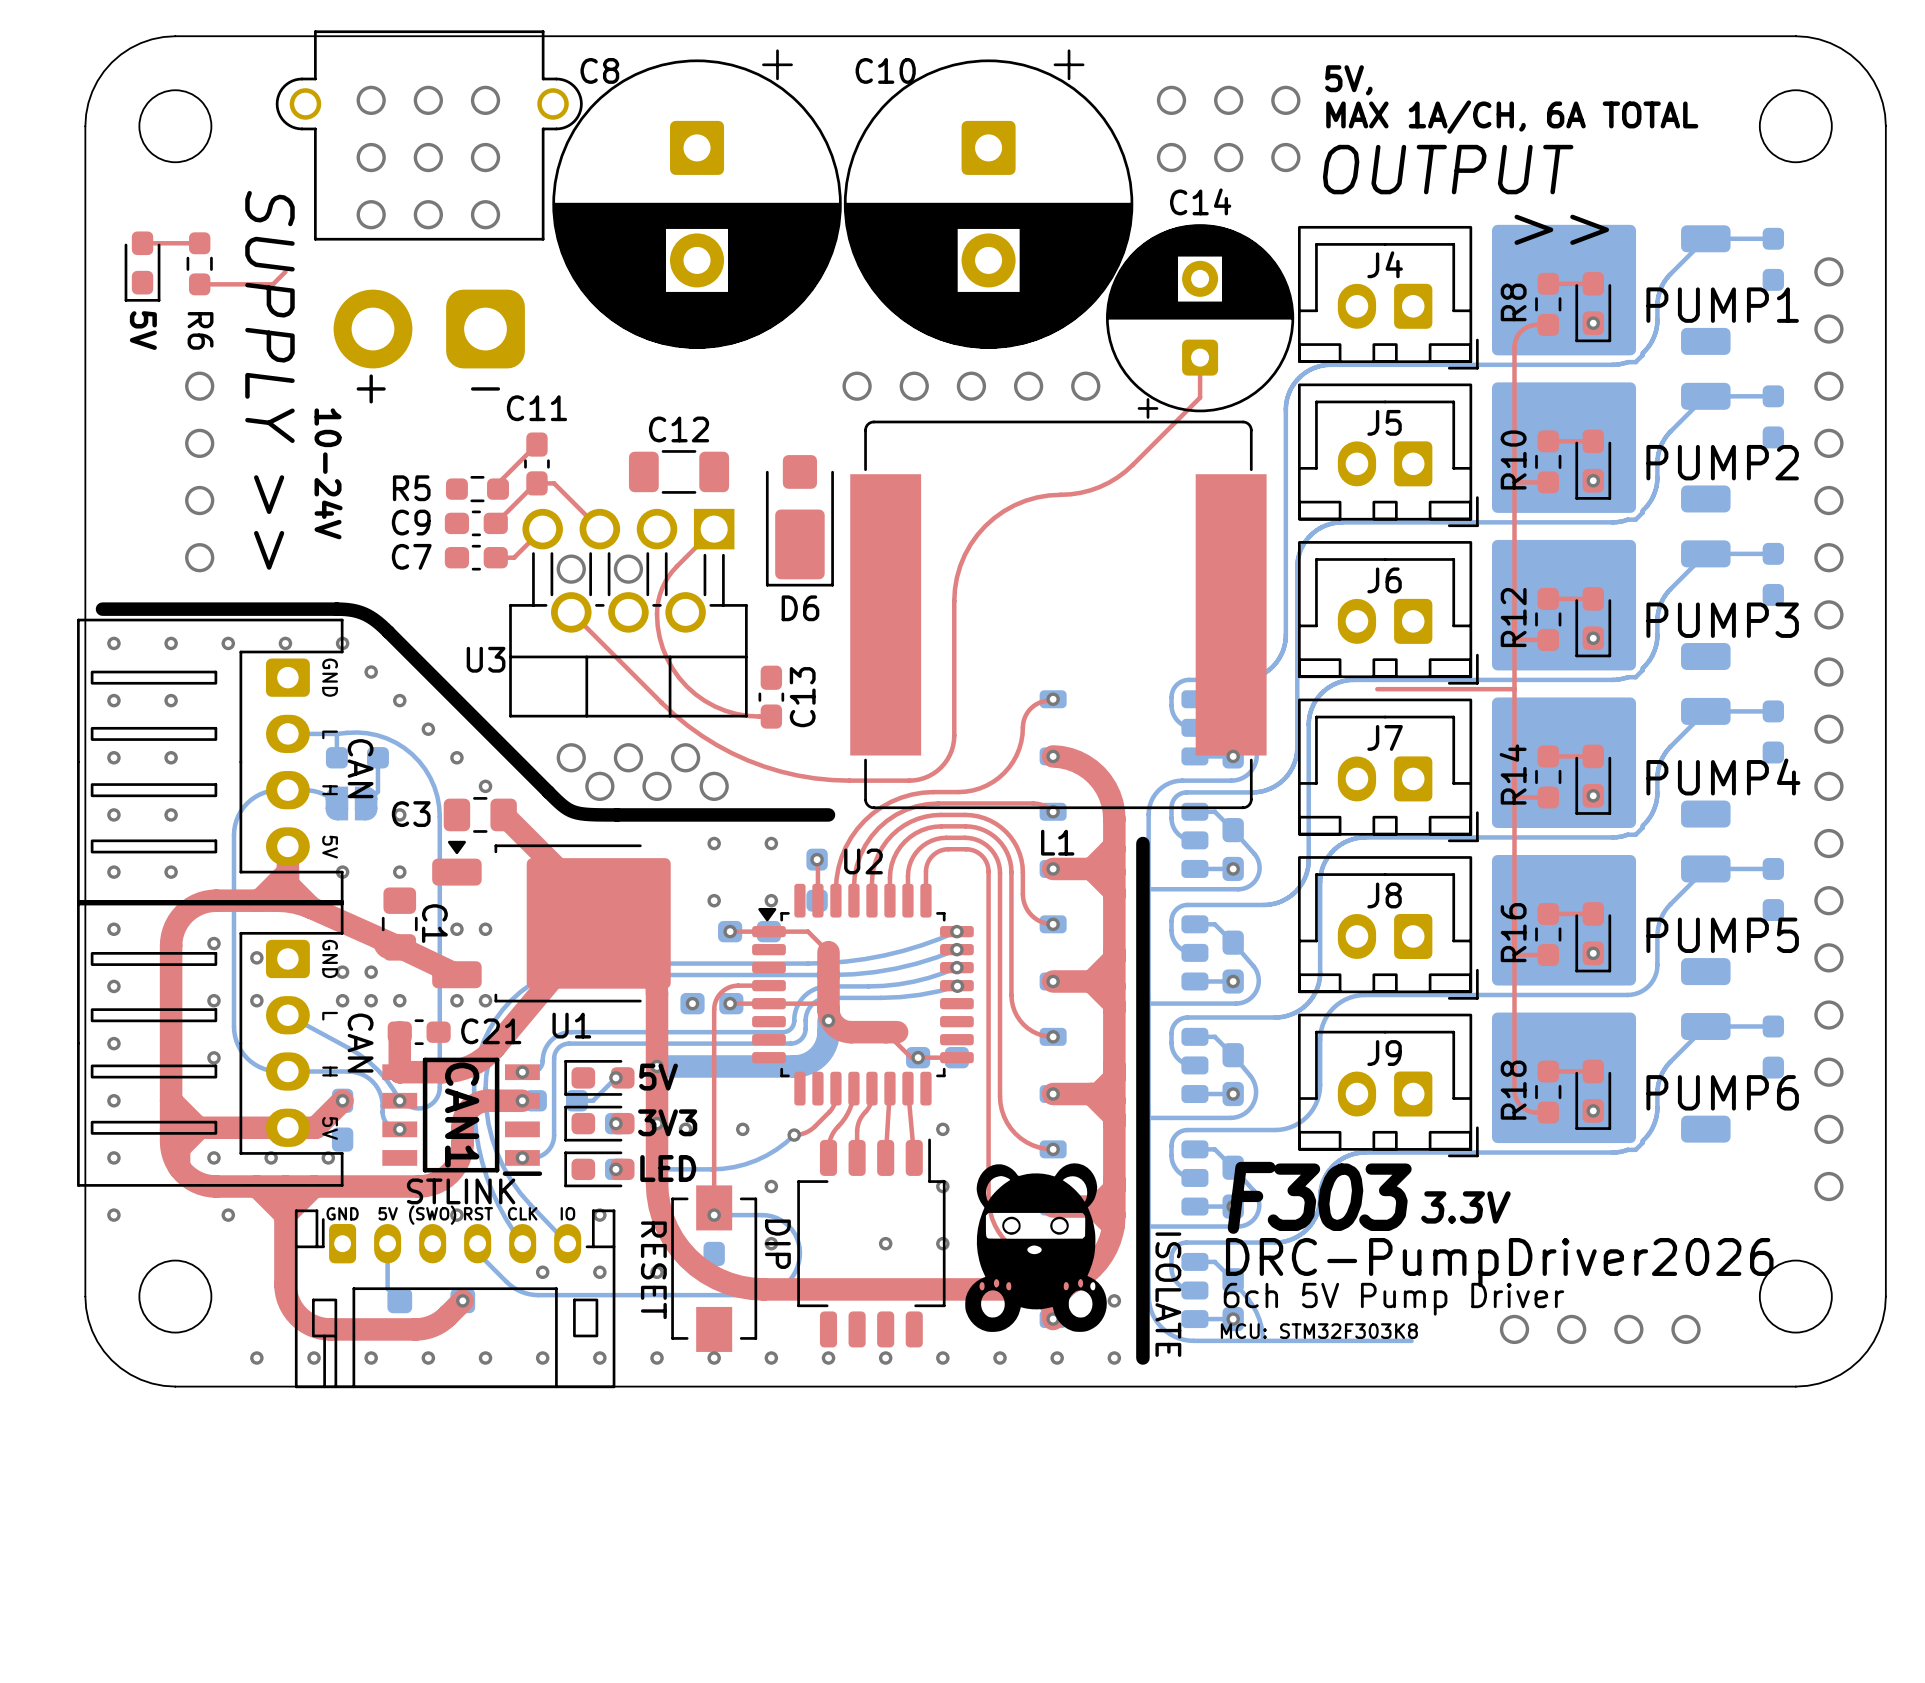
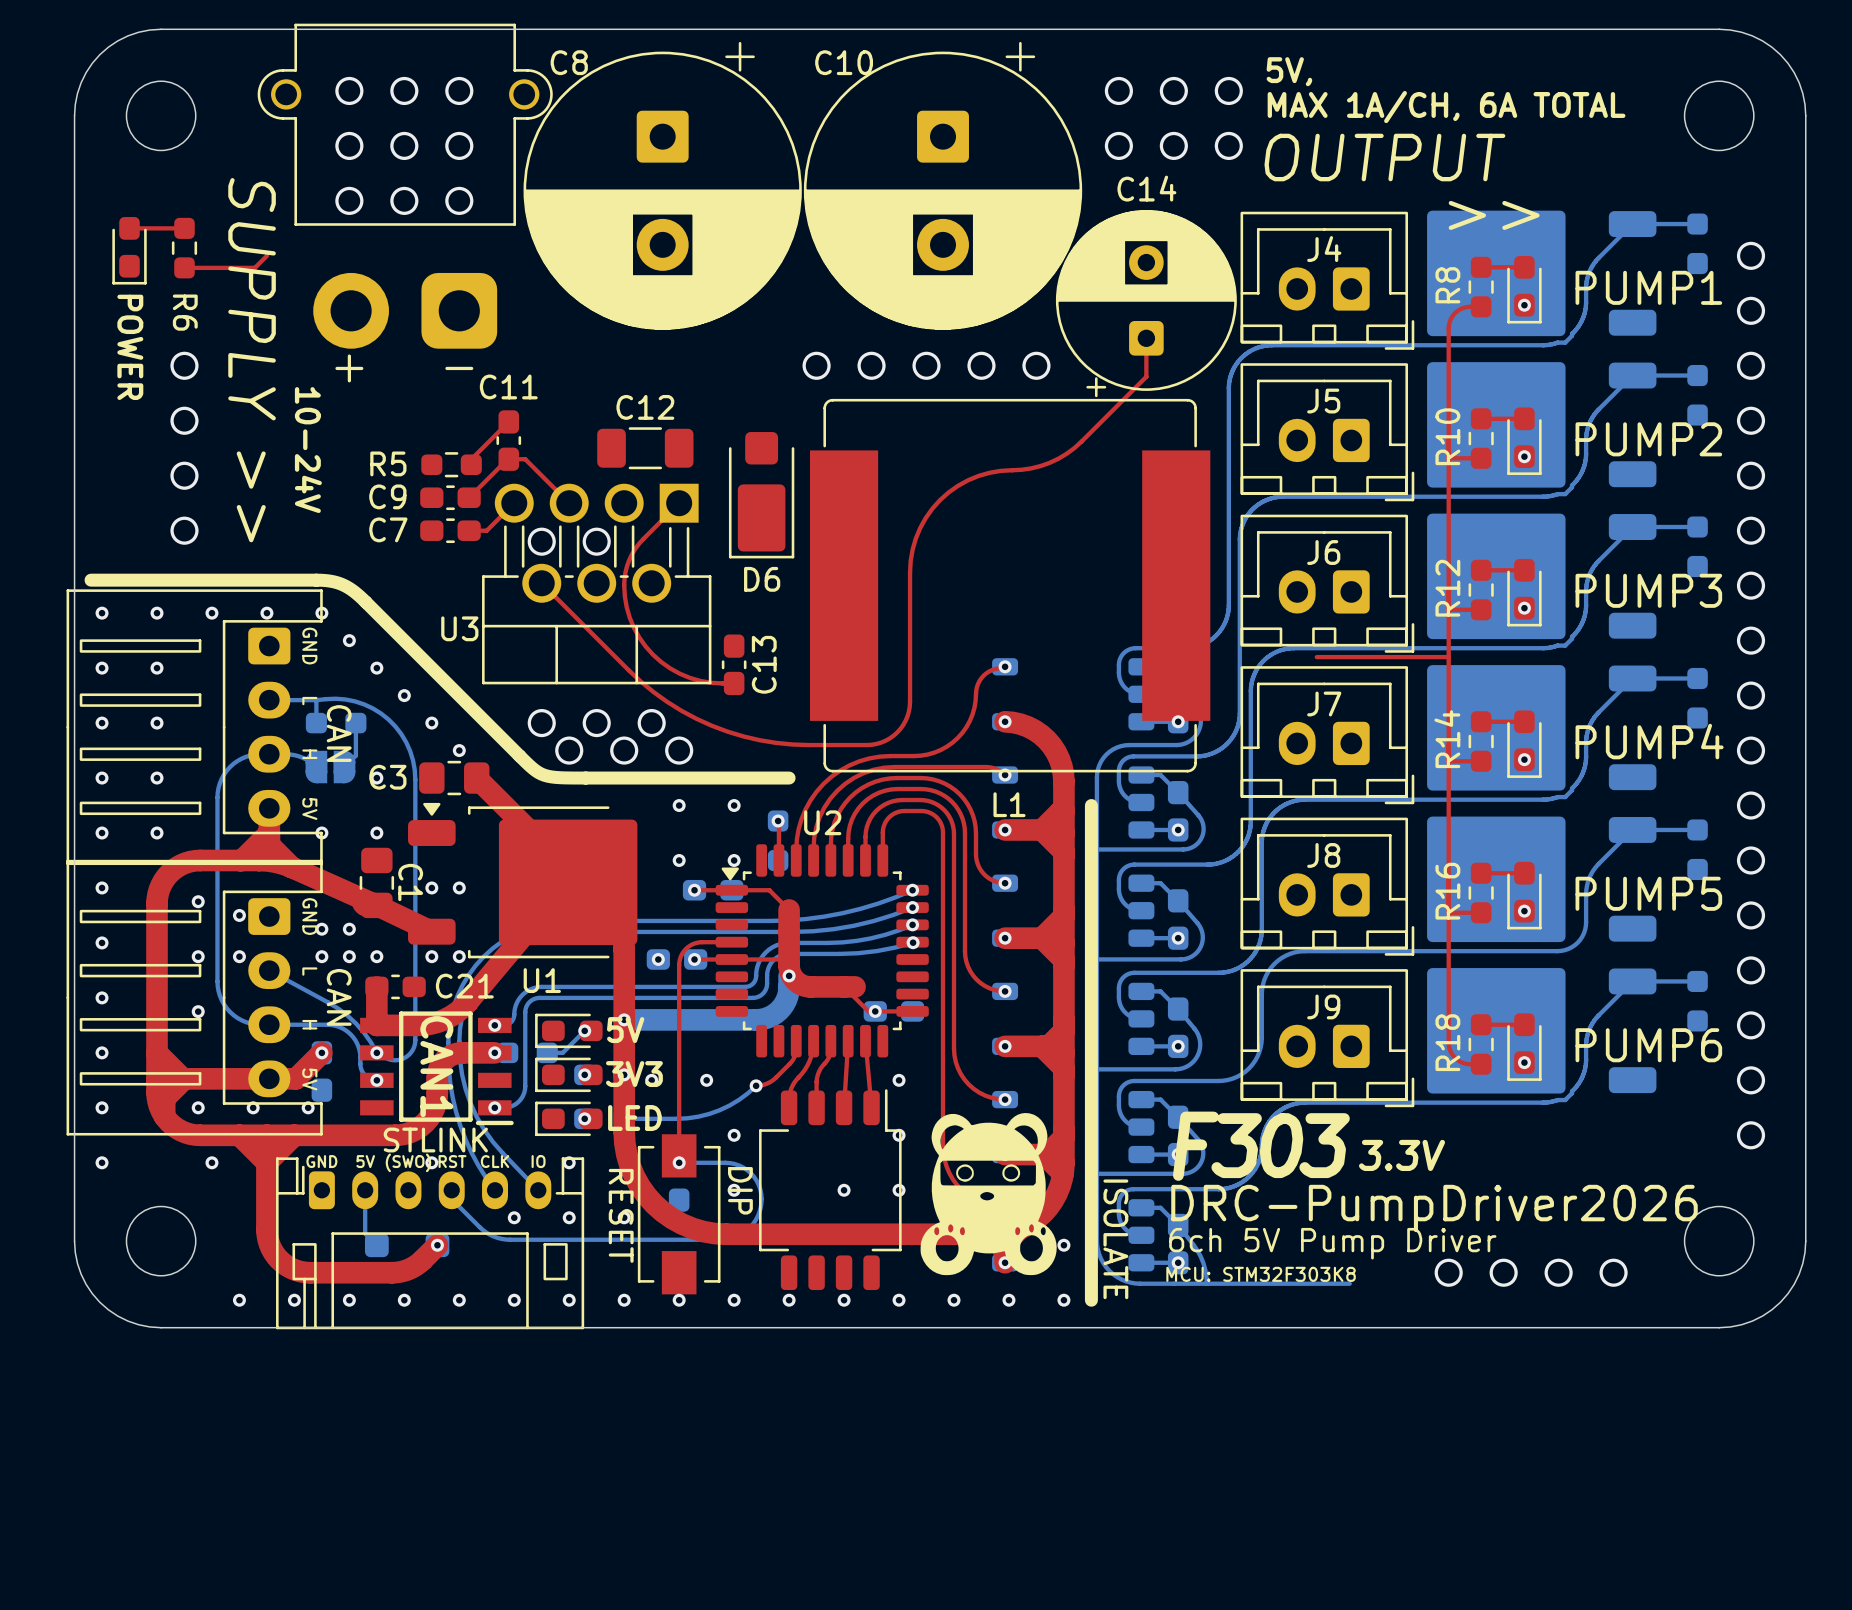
part value: 5V (143, 330) -> POWER (130, 347)

